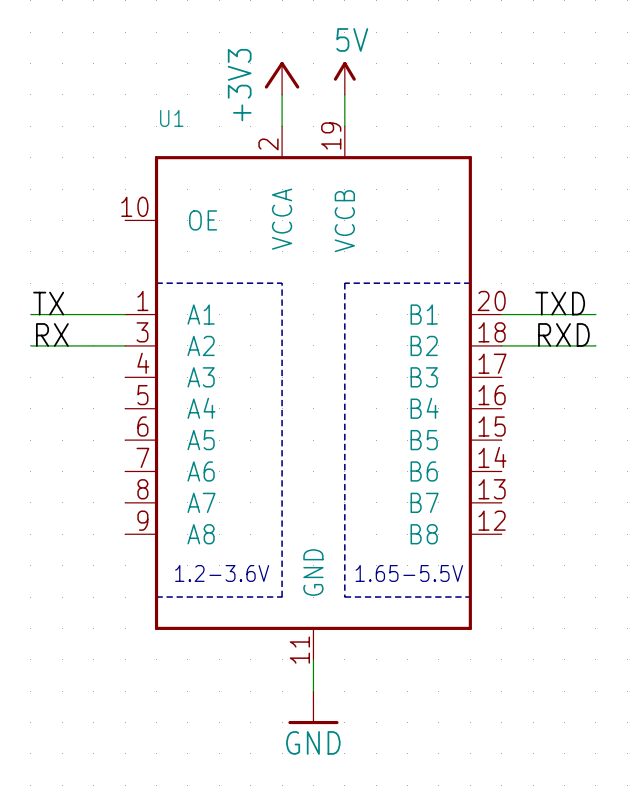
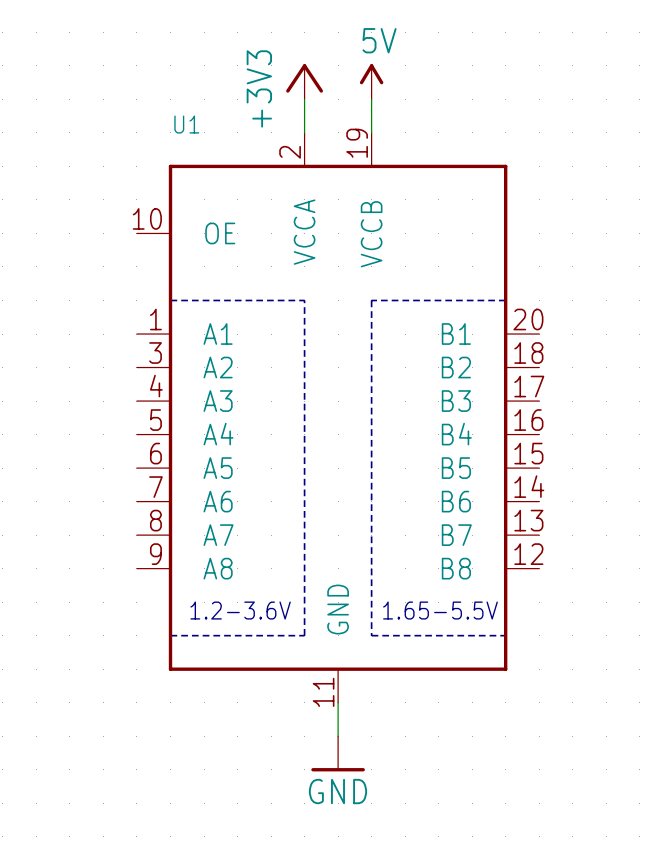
label: TX (48, 303) -> none
label: TXD (560, 303) -> none
wire: (30, 314) (125, 314) -> none
wire: (501, 314) (595, 314) -> none
label: RX (52, 334) -> none
label: RXD (563, 334) -> none
wire: (30, 345) (125, 345) -> none
wire: (501, 345) (595, 345) -> none

